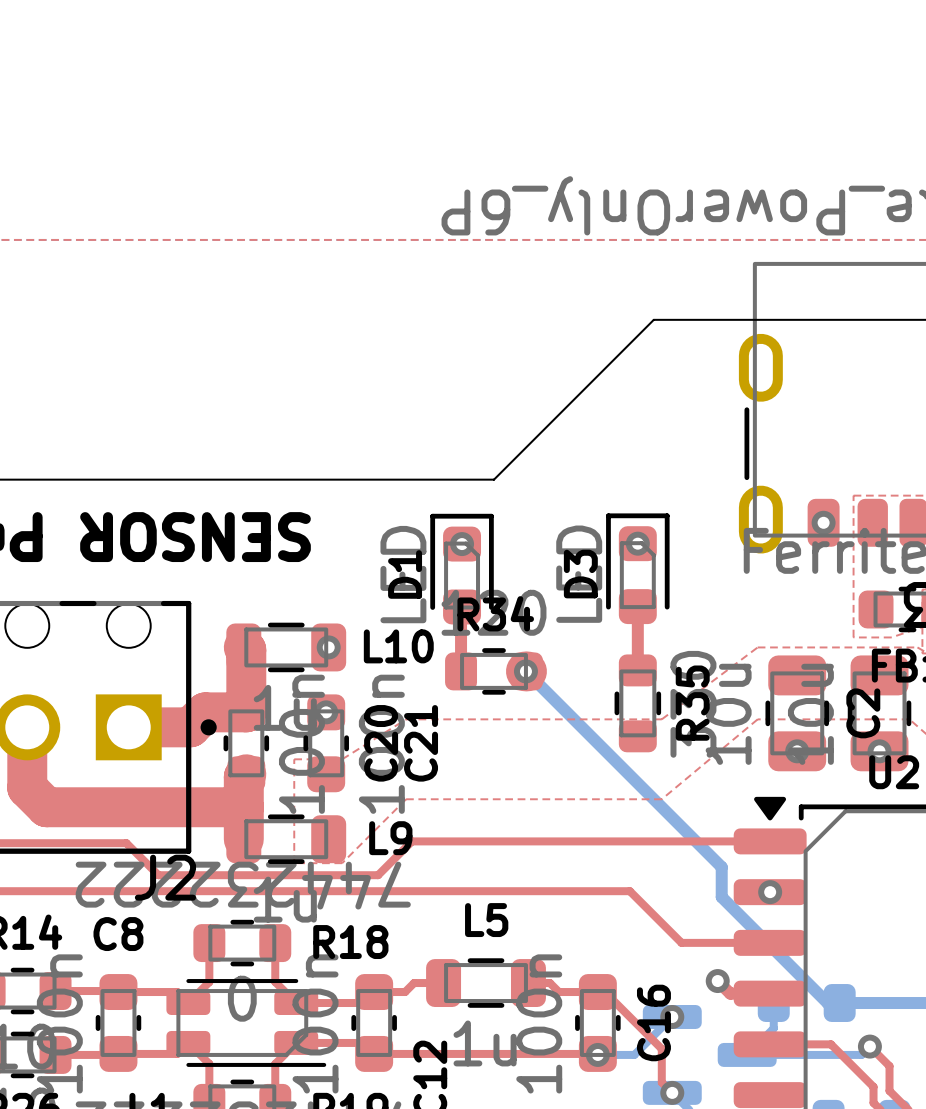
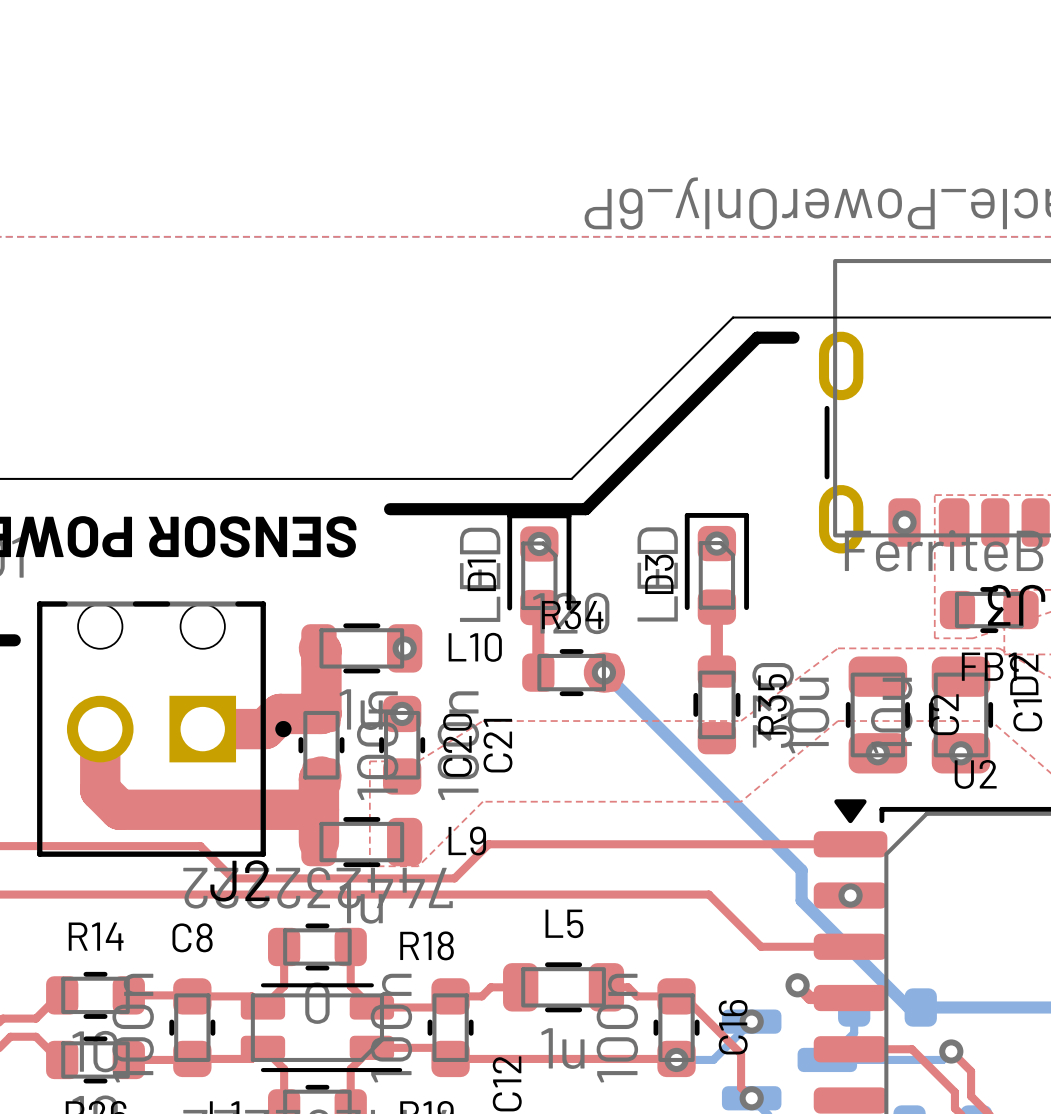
line: none -> (793, 337) (757, 337) (585, 509) (390, 509)

